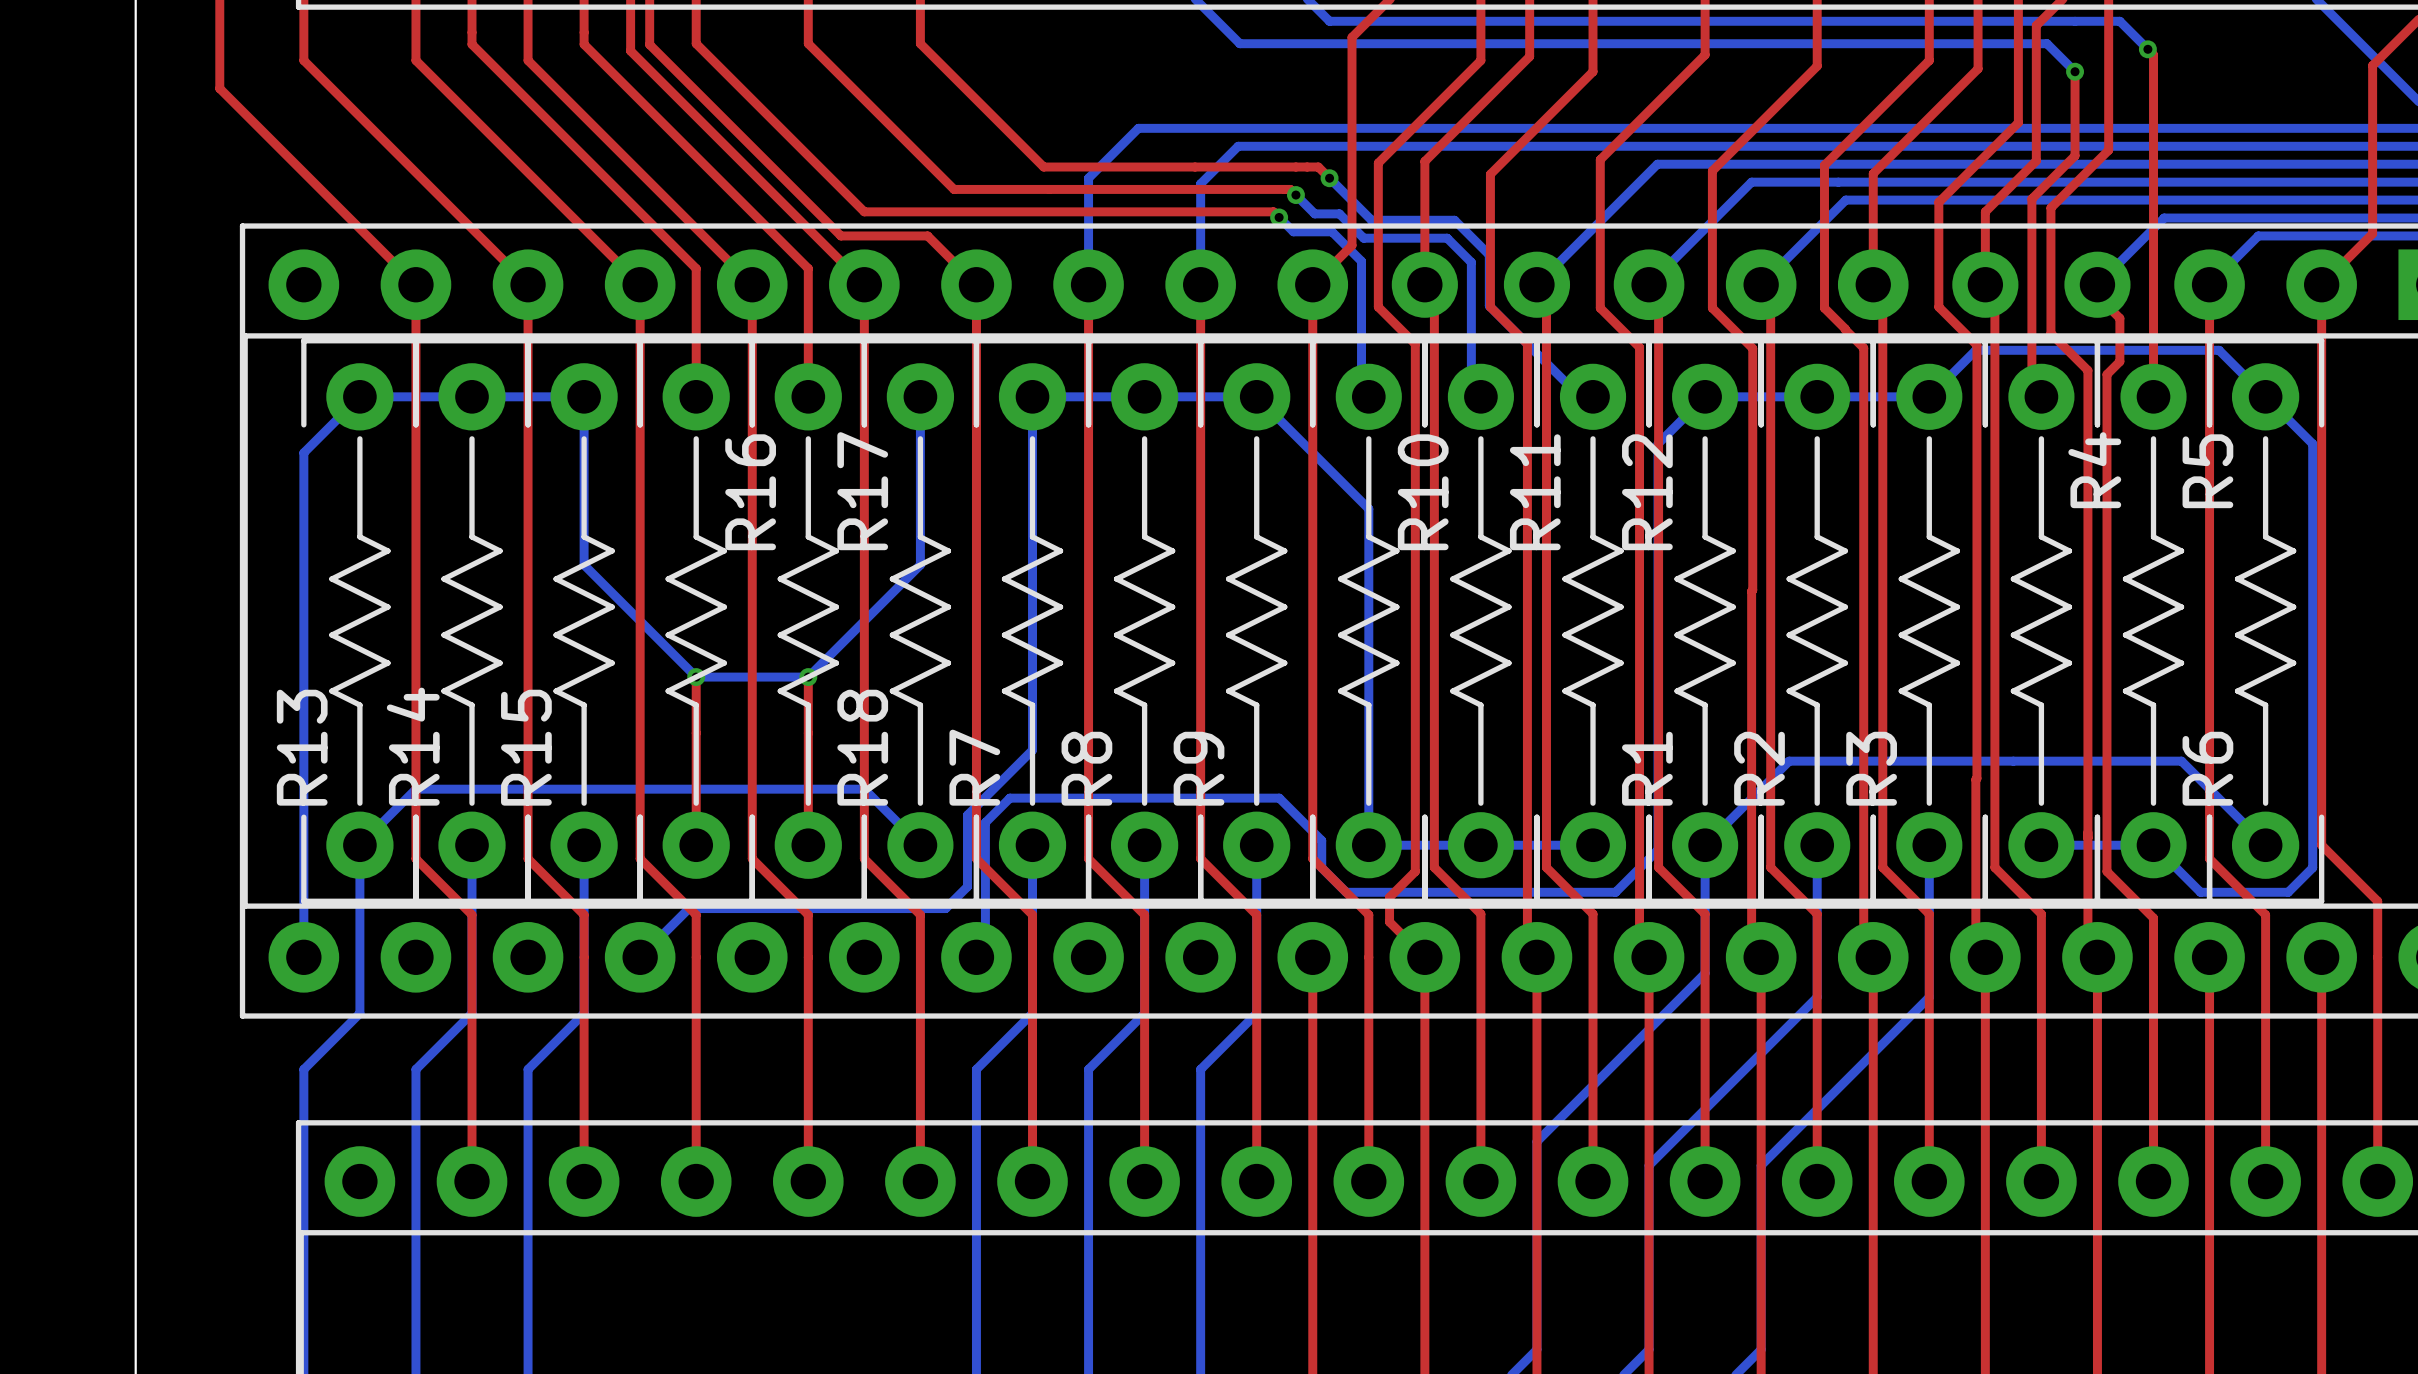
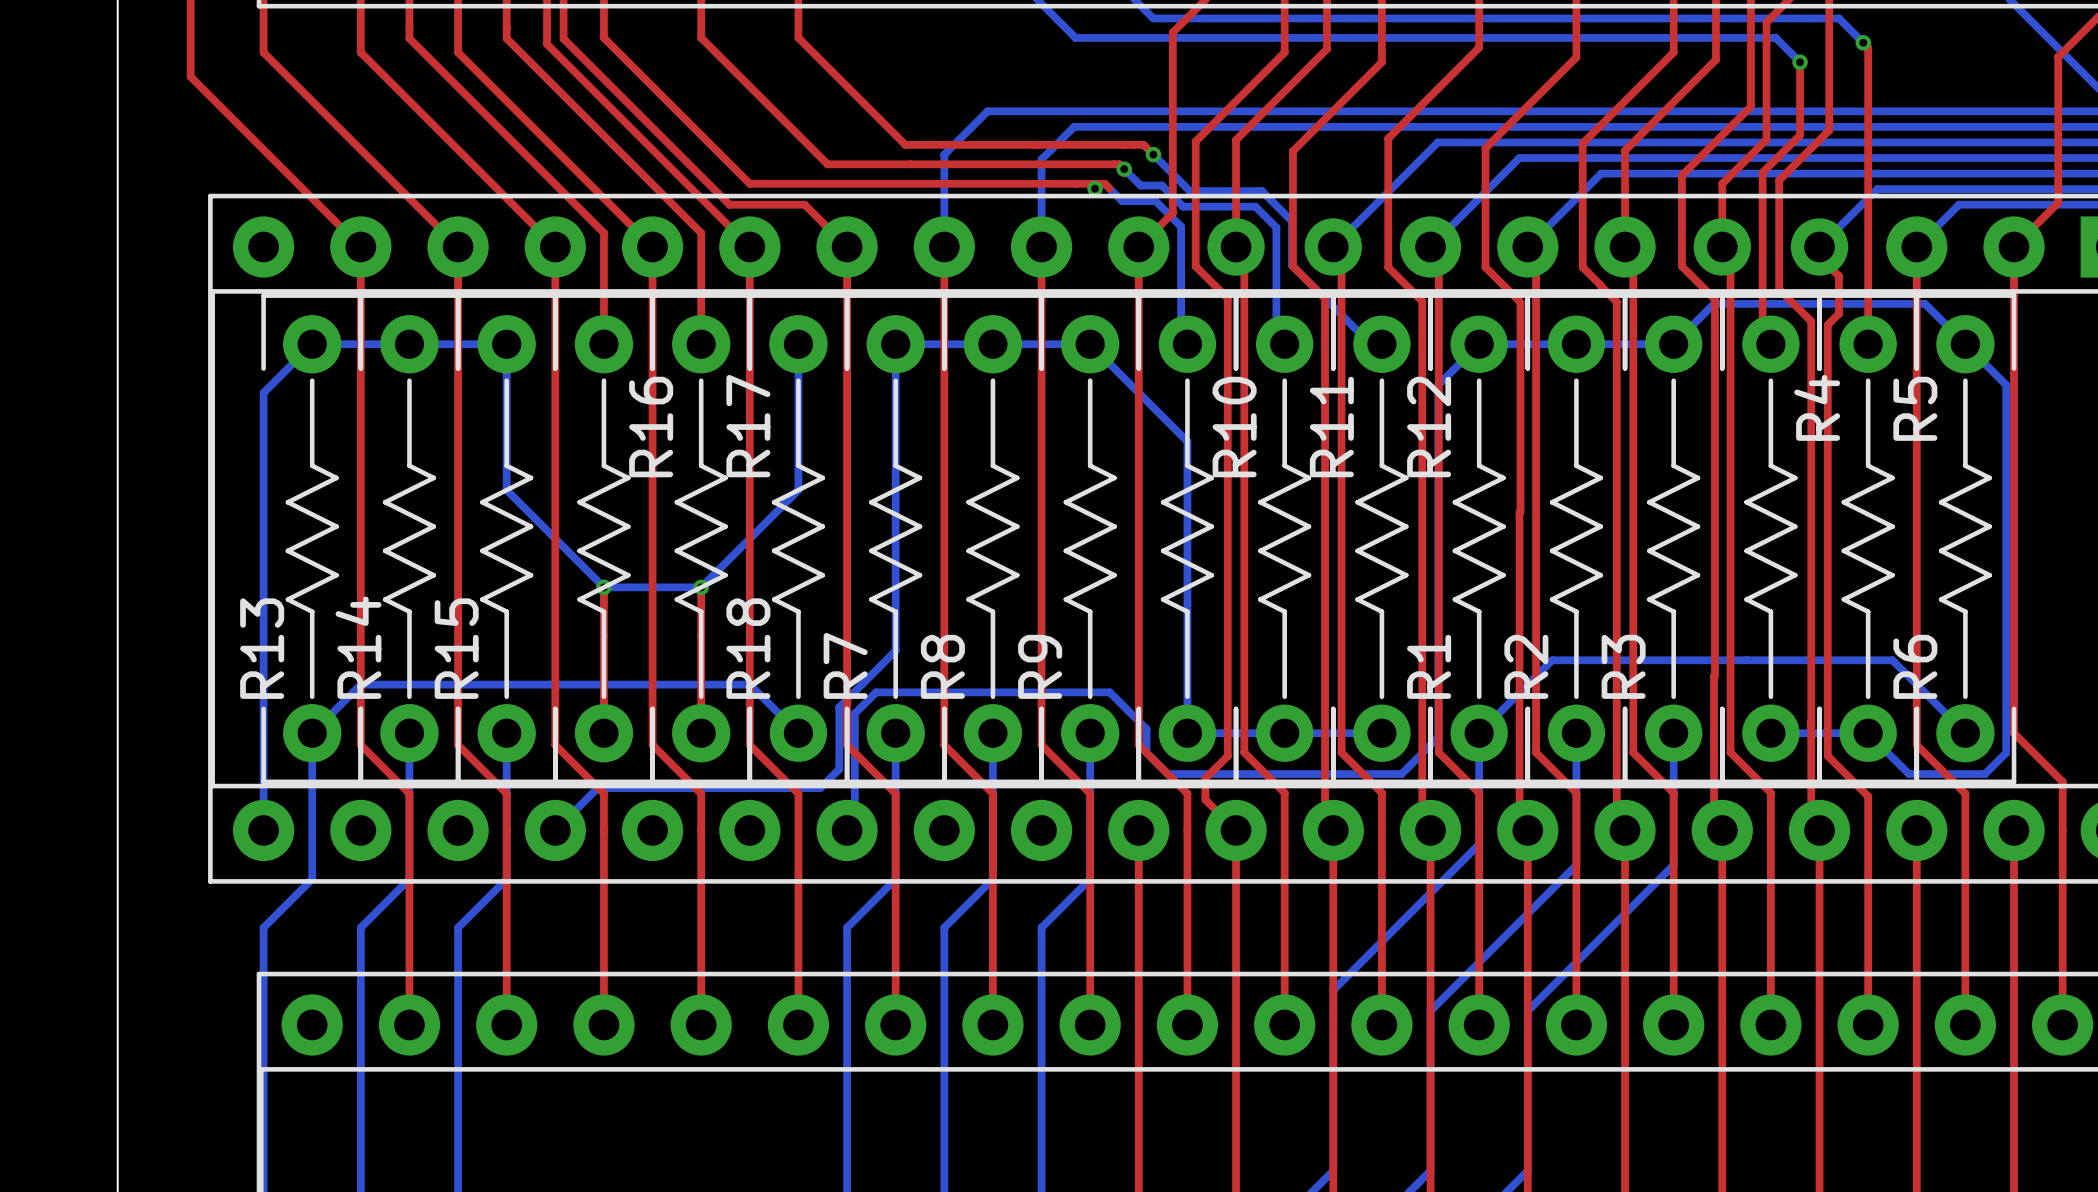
via position: (1279, 217) -> (1095, 188)

